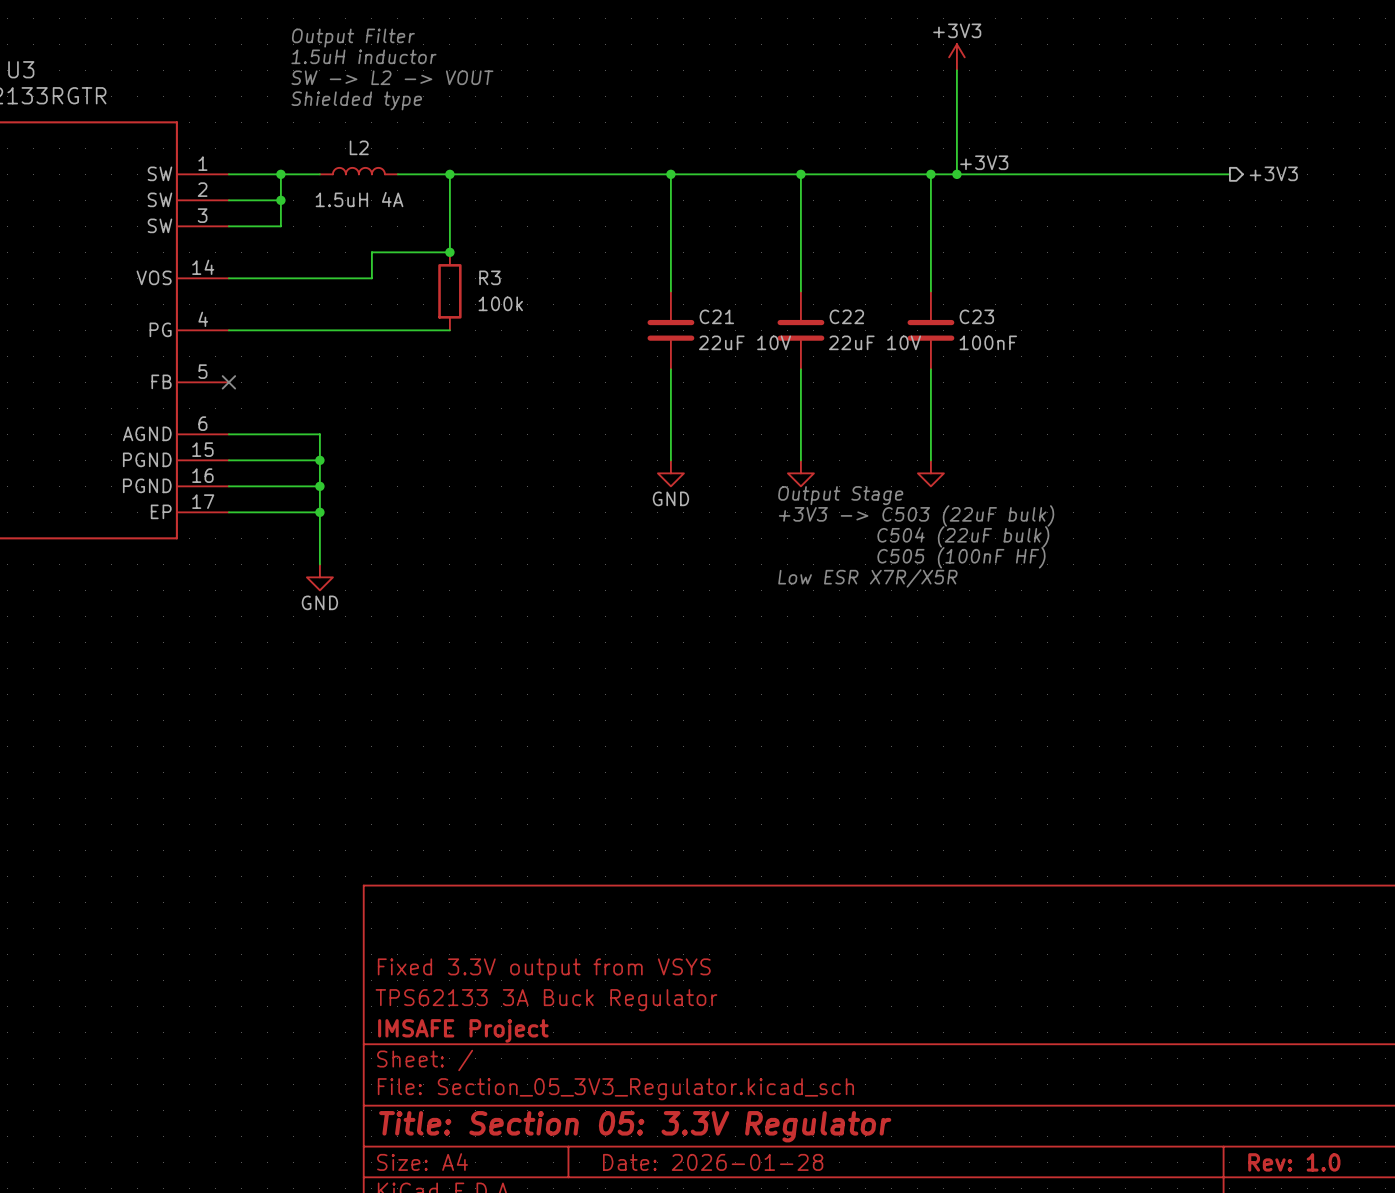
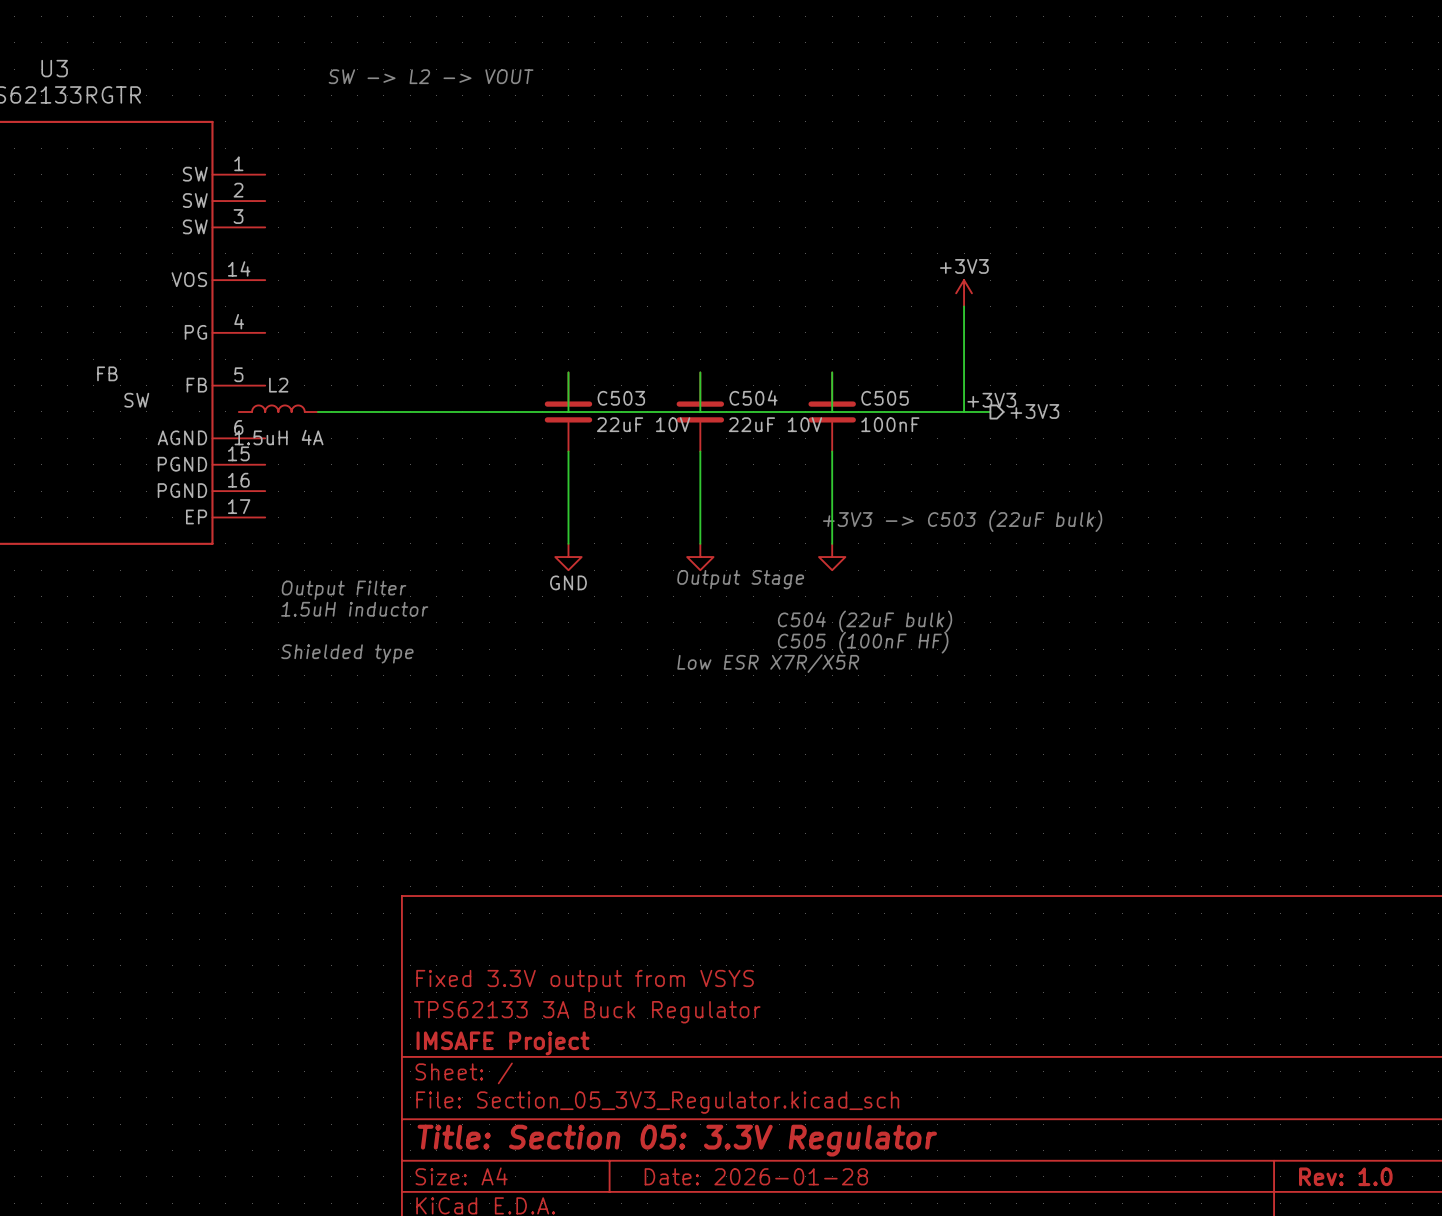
text: Output Filter (353, 38) -> none
text: 1.5uH inductor (363, 56) -> none
power symbol position: +3V3 (956, 57) -> +3V3 (964, 293)
wire: (956, 70) (956, 174) -> (964, 306) (964, 411)
text: Shielded type (356, 100) -> none
label position: +3V3 (984, 162) -> +3V3 (991, 400)
L2 position: (358, 171) -> (278, 408)
hierarchical label: +3V3 (1273, 173) -> none
wire: (228, 174) (319, 174) -> none
wire: (280, 174) (280, 226) (228, 226) -> none
junction: (280, 174) -> none
wire: (397, 174) (1229, 174) -> none
wire: (449, 174) (449, 252) (371, 252) (371, 278) (228, 278) -> none
junction: (449, 174) -> none
wire: (670, 174) (670, 291) -> none
junction: (670, 174) -> none
wire: (800, 174) (800, 291) -> none
junction: (800, 174) -> none
wire: (930, 174) (930, 291) -> none
junction: (930, 174) -> none
junction: (956, 174) -> none
wire: (228, 200) (280, 200) -> none
junction: (280, 200) -> none
junction: (449, 252) -> none
R3: 100k (449, 291) -> none
wire: (228, 330) (449, 330) -> none
C21: 22uF 10V (670, 330) -> none
C22: 22uF 10V (800, 330) -> none
C23: 100nF (930, 330) -> none
wire: none -> (568, 372) (568, 411)
wire: none -> (700, 372) (700, 411)
wire: (670, 369) (670, 460) -> (568, 451) (568, 543)
wire: none -> (832, 372) (832, 411)
wire: (800, 369) (800, 460) -> (700, 451) (700, 543)
wire: (930, 369) (930, 460) -> (832, 451) (832, 543)
label: none -> FB (107, 373)
no-connect mark: (228, 382) -> none
label: none -> SW (136, 400)
hierarchical label: none -> +3V3 (1034, 411)
wire: none -> (317, 411) (990, 411)
C503: none -> 22uF 10V (568, 411)
C504: none -> 22uF 10V (700, 411)
C505: none -> 100nF (832, 411)
wire: (228, 434) (319, 434) (319, 564) -> none
wire: (228, 460) (319, 460) -> none
junction: (319, 460) -> none
power symbol: GND (670, 473) -> none
power symbol position: (800, 473) -> (832, 557)
power symbol: (930, 473) -> none
wire: (228, 486) (319, 486) -> none
junction: (319, 486) -> none
text position: Output Stage (840, 495) -> Output Stage (740, 579)
wire: (228, 512) (319, 512) -> none
junction: (319, 512) -> none
text position: C504 (22uF bulk) (963, 536) -> C504 (22uF bulk) (865, 621)
power symbol: none -> GND (568, 557)
power symbol: none -> (700, 557)
text position: C505 (100nF HF) (961, 557) -> C505 (100nF HF) (863, 642)
power symbol: GND (319, 577) -> none
text position: Low ESR X7R/X5R (867, 578) -> Low ESR X7R/X5R (768, 663)
text: none -> Output Filter (343, 590)
text: none -> 1.5uH inductor (354, 609)
text: none -> Shielded type (347, 653)

